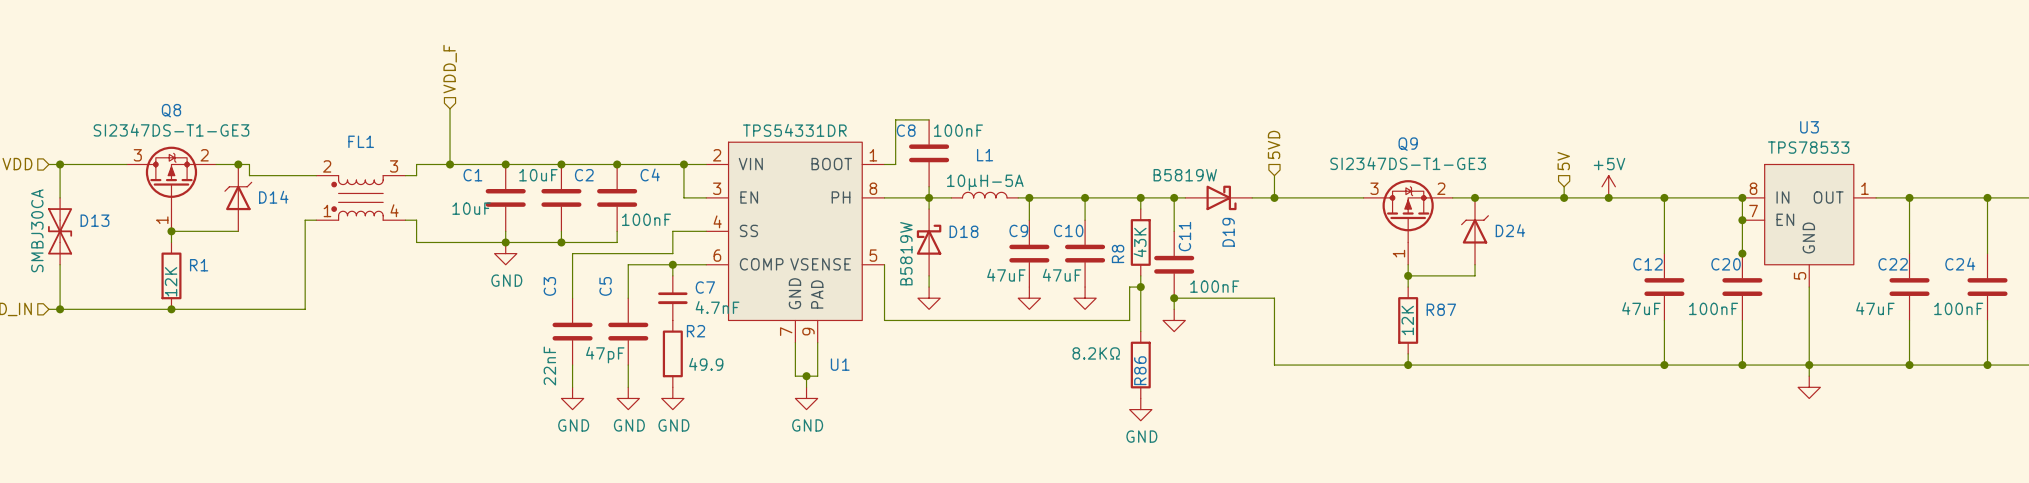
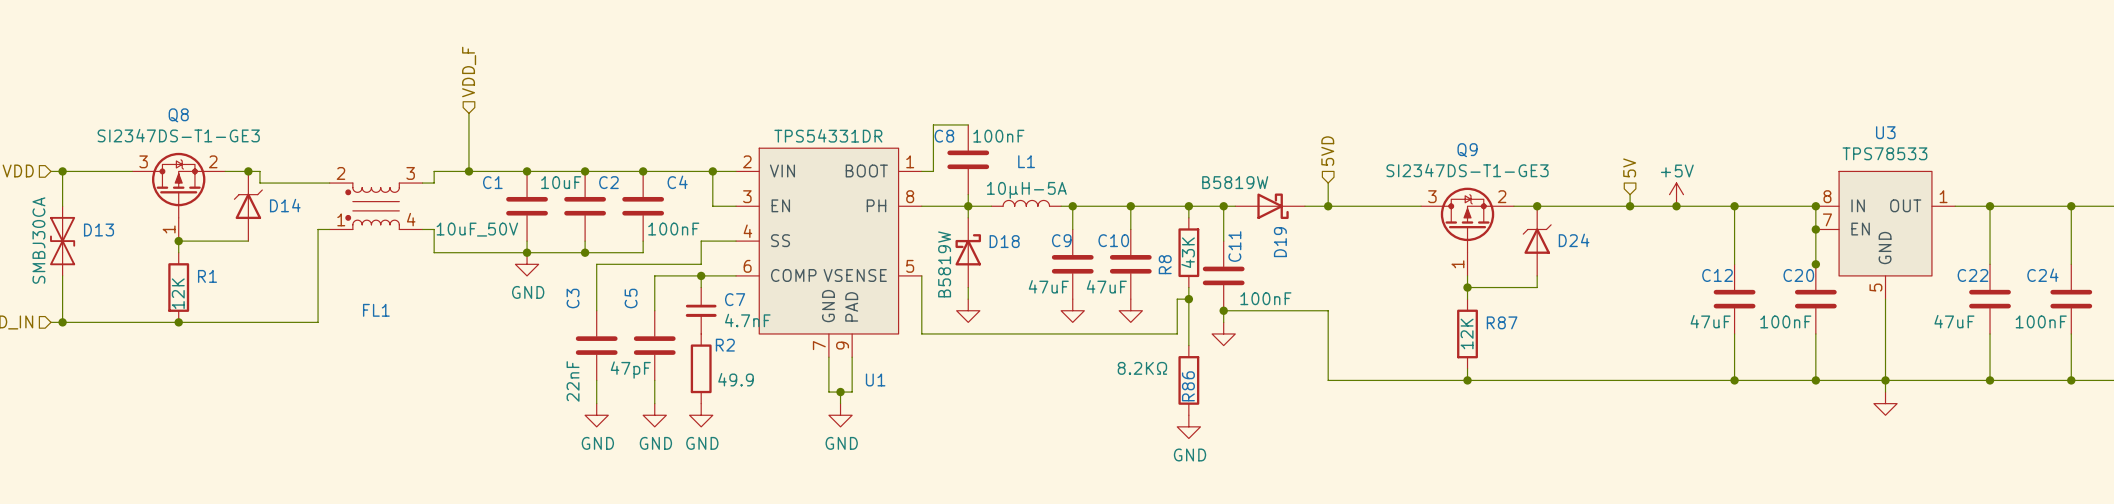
FL1 name position: FL1 (361, 141) -> FL1 (376, 310)
C1 value: 10uF (471, 208) -> 10uF_50V (477, 229)

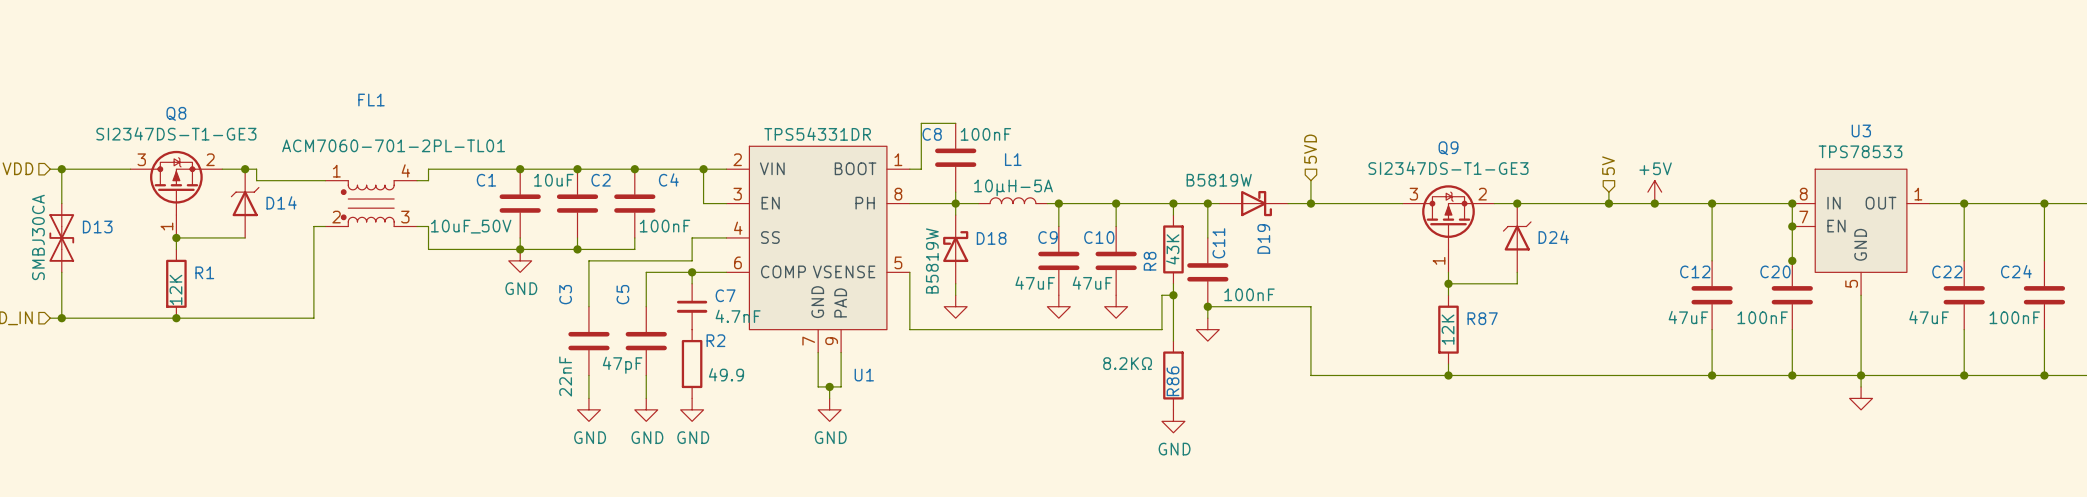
hierarchical label: VDD_F (469, 72) -> none
wire: (468, 113) (468, 171) -> none
FL1 value: none -> ACM7060-701-2PL-TL01 (393, 145)
junction: (468, 171) -> none
FL1 flip: as is (372, 206) -> up-down (367, 203)

